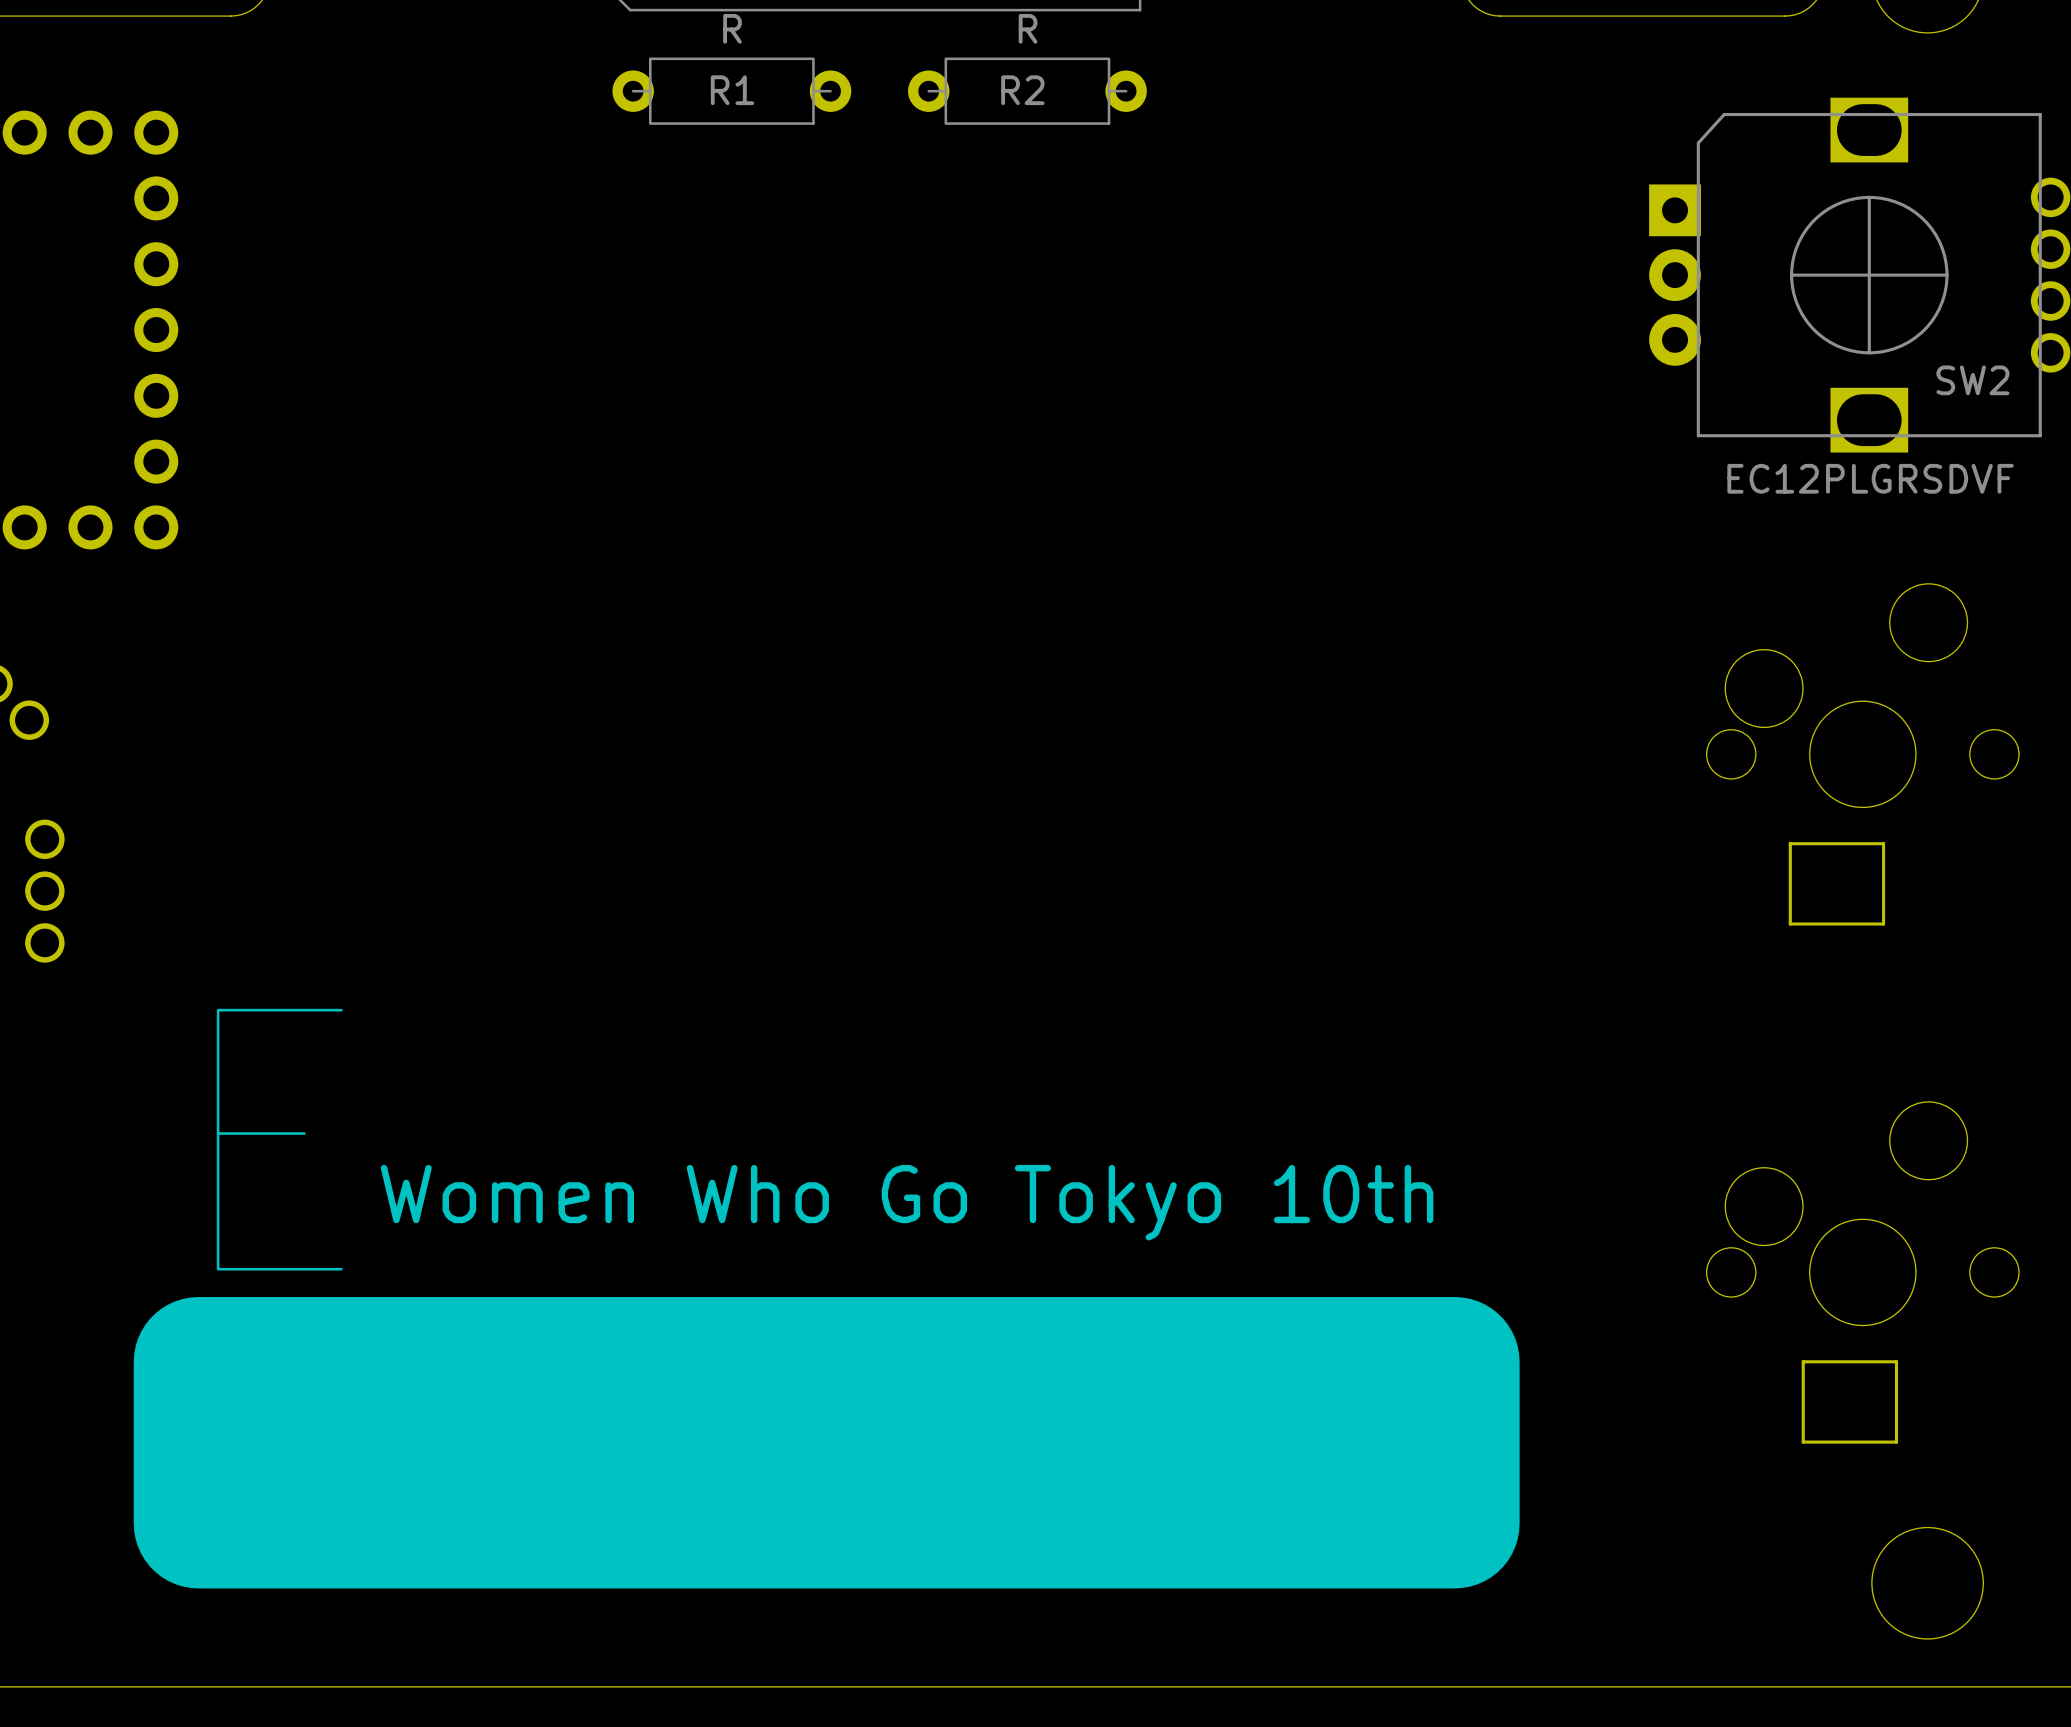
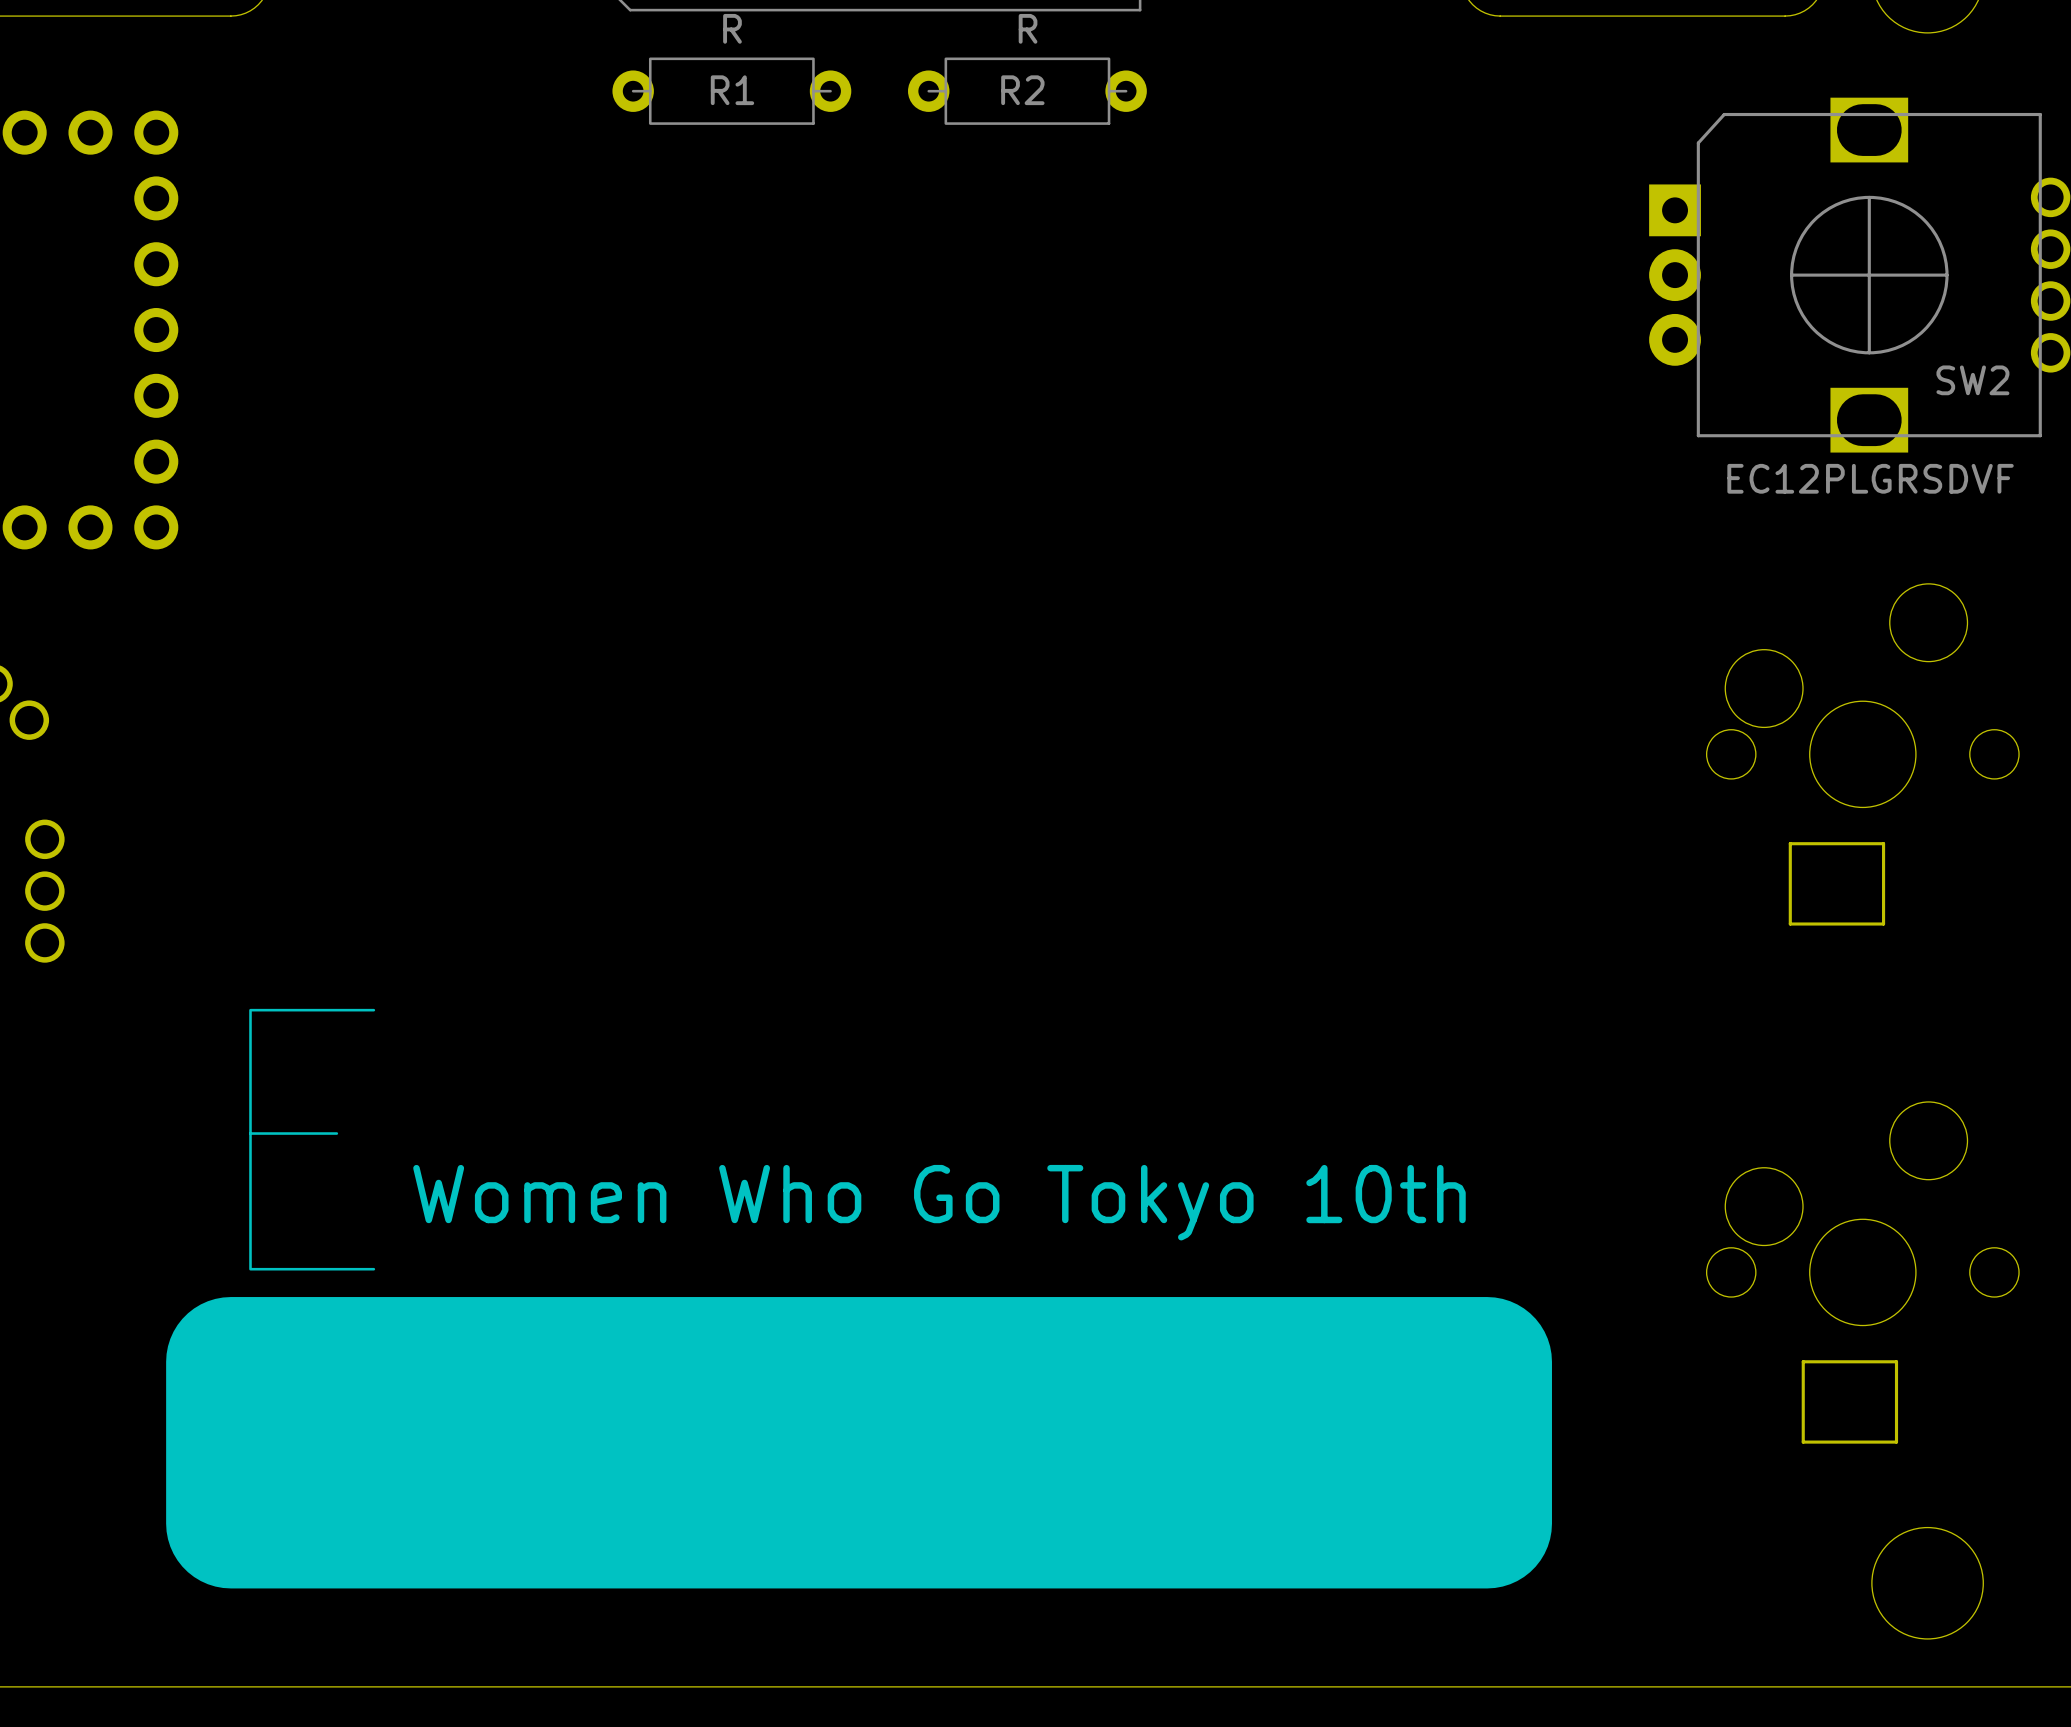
text position: E (279, 1139) -> E (312, 1139)
text position: Women Who Go Tokyo 10th (907, 1202) -> Women Who Go Tokyo 10th (939, 1202)
drawing position: (826, 1442) -> (859, 1442)

